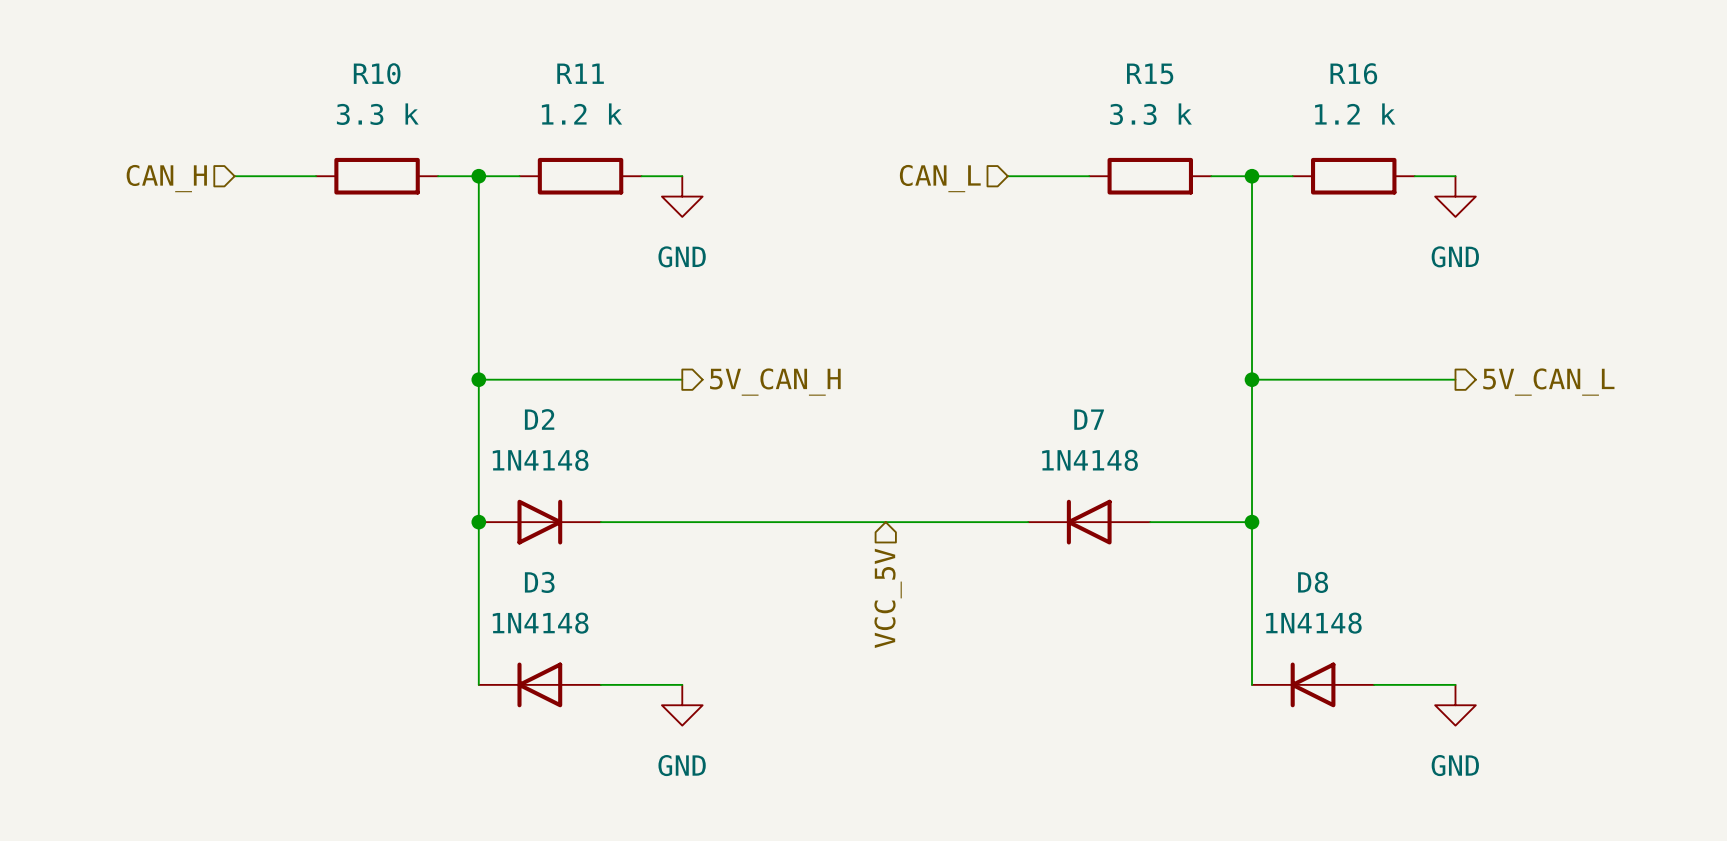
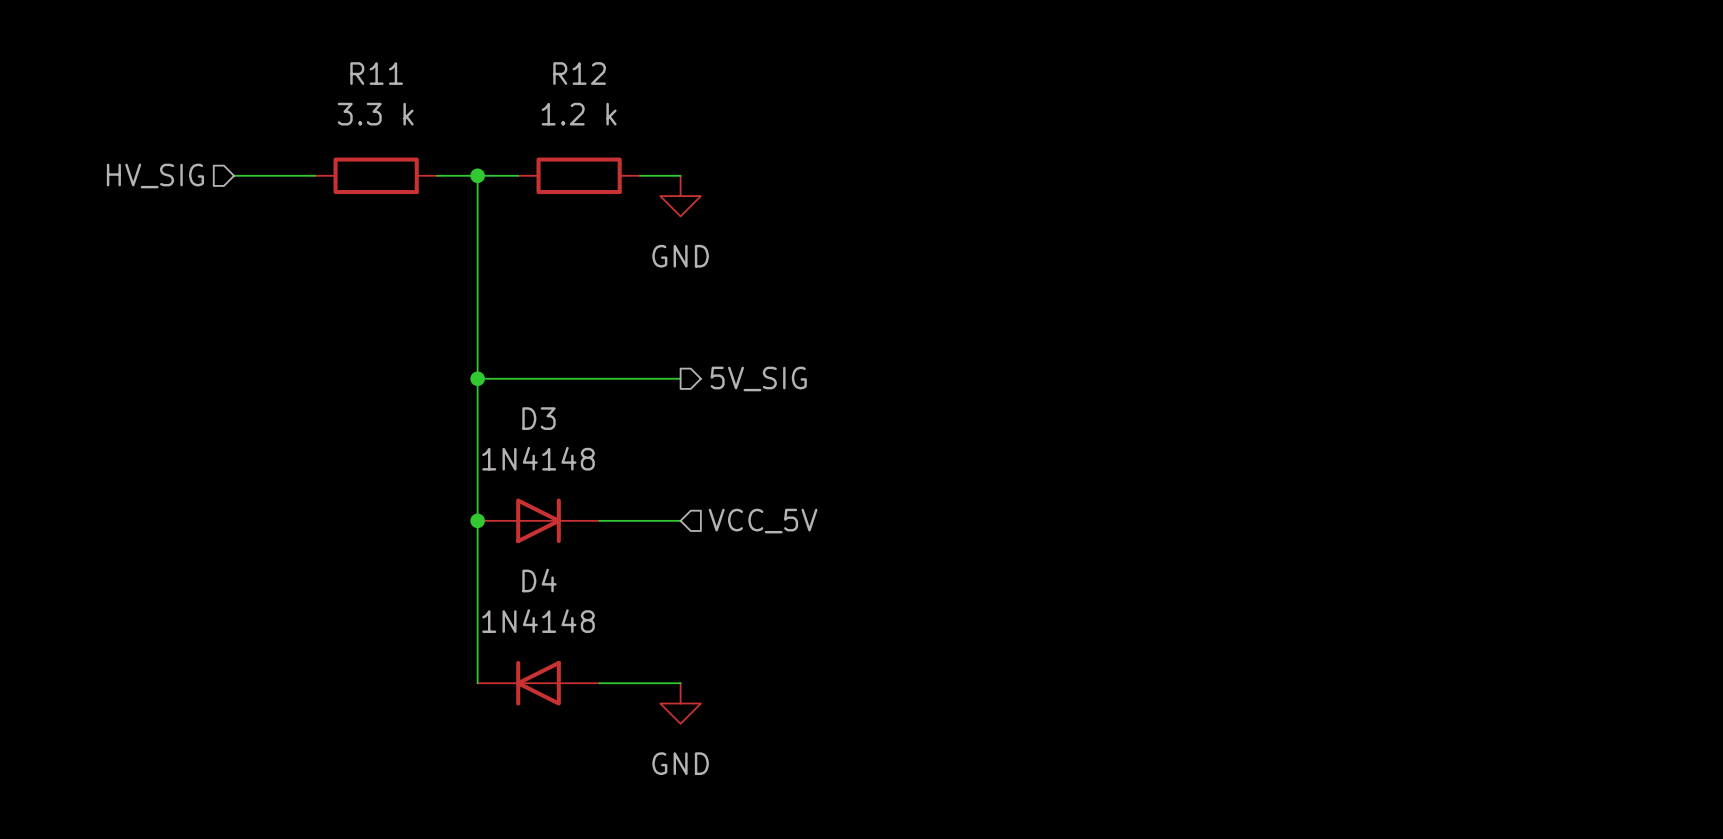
R10 name: R10 (377, 73) -> R11 (376, 73)
R11 name: R11 (580, 73) -> R12 (579, 73)
wire: (1007, 176) (1089, 176) -> none
R15: 3.3 k (1150, 176) -> none
wire: (1211, 176) (1292, 176) -> none
wire: (1252, 176) (1252, 684) -> none
junction: (1252, 176) -> none
R16: 1.2 k (1353, 176) -> none
wire: (1414, 176) (1455, 176) -> none
hierarchical label: CAN_H (166, 178) -> HV_SIG (155, 176)
hierarchical label: CAN_L (940, 178) -> none
power symbol: GND (1455, 196) -> none
wire: (1252, 379) (1455, 379) -> none
junction: (1252, 379) -> none
hierarchical label: 5V_CAN_H (775, 382) -> 5V_SIG (758, 378)
hierarchical label: 5V_CAN_L (1548, 382) -> none
D2 name: D2 (539, 419) -> D3 (539, 418)
wire: (682, 522) (1028, 522) -> none
D7: 1N4148 (1089, 522) -> none
wire: (1150, 522) (1252, 522) -> none
junction: (1252, 522) -> none
D3 name: D3 (539, 582) -> D4 (539, 580)
hierarchical label rotation: 0° (888, 598) -> 90° counterclockwise (763, 521)
hierarchical label position: VCC_5V (888, 598) -> VCC_5V (763, 521)
D8: 1N4148 (1313, 684) -> none
wire: (1374, 684) (1455, 684) -> none
power symbol: GND (1455, 705) -> none

